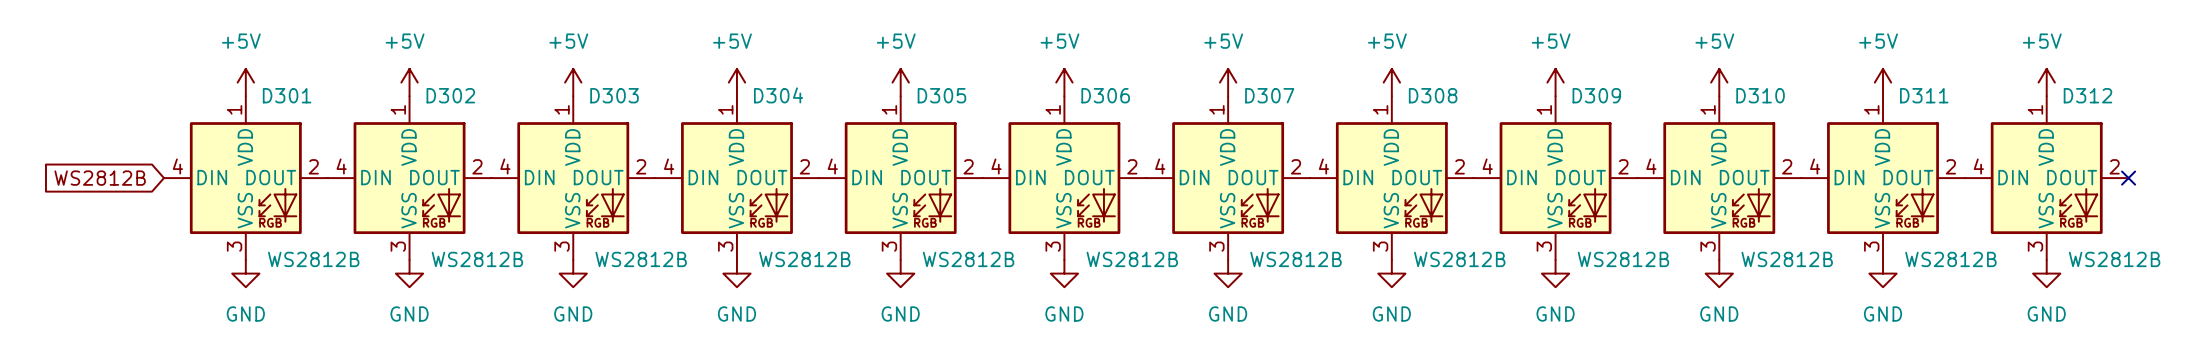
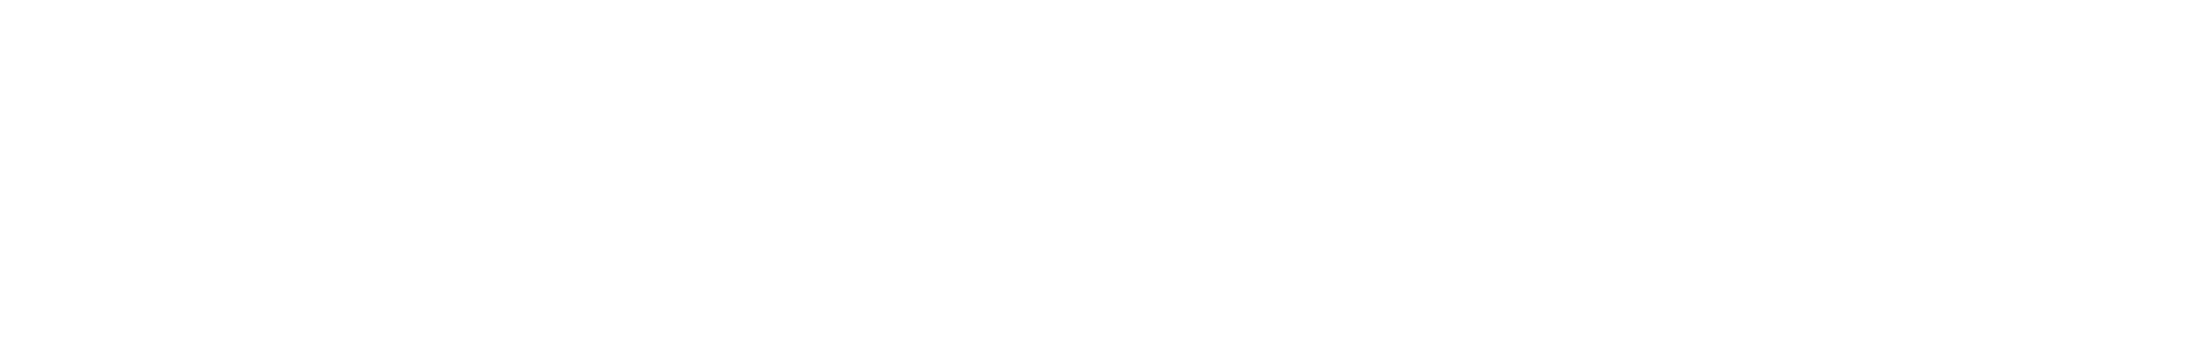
power symbol: +5V (245, 82) -> none
power symbol: +5V (409, 82) -> none
power symbol: +5V (573, 82) -> none
power symbol: +5V (736, 82) -> none
power symbol: +5V (900, 82) -> none
power symbol: +5V (1064, 82) -> none
power symbol: +5V (1228, 82) -> none
power symbol: +5V (1391, 82) -> none
power symbol: +5V (1555, 82) -> none
power symbol: +5V (1719, 82) -> none
power symbol: +5V (1883, 82) -> none
power symbol: +5V (2046, 82) -> none
global label: WS2812B (100, 178) -> none
D301: WS2812B (245, 178) -> none
D302: WS2812B (409, 178) -> none
D303: WS2812B (573, 178) -> none
D304: WS2812B (736, 178) -> none
D305: WS2812B (900, 178) -> none
D306: WS2812B (1064, 178) -> none
D307: WS2812B (1228, 178) -> none
D308: WS2812B (1391, 178) -> none
D309: WS2812B (1555, 178) -> none
D310: WS2812B (1719, 178) -> none
D311: WS2812B (1883, 178) -> none
D312: WS2812B (2046, 178) -> none
no-connect mark: (2128, 178) -> none
power symbol: GND (245, 273) -> none
power symbol: GND (409, 273) -> none
power symbol: GND (573, 273) -> none
power symbol: GND (736, 273) -> none
power symbol: GND (900, 273) -> none
power symbol: GND (1064, 273) -> none
power symbol: GND (1228, 273) -> none
power symbol: GND (1391, 273) -> none
power symbol: GND (1555, 273) -> none
power symbol: GND (1719, 273) -> none
power symbol: GND (1883, 273) -> none
power symbol: GND (2046, 273) -> none

